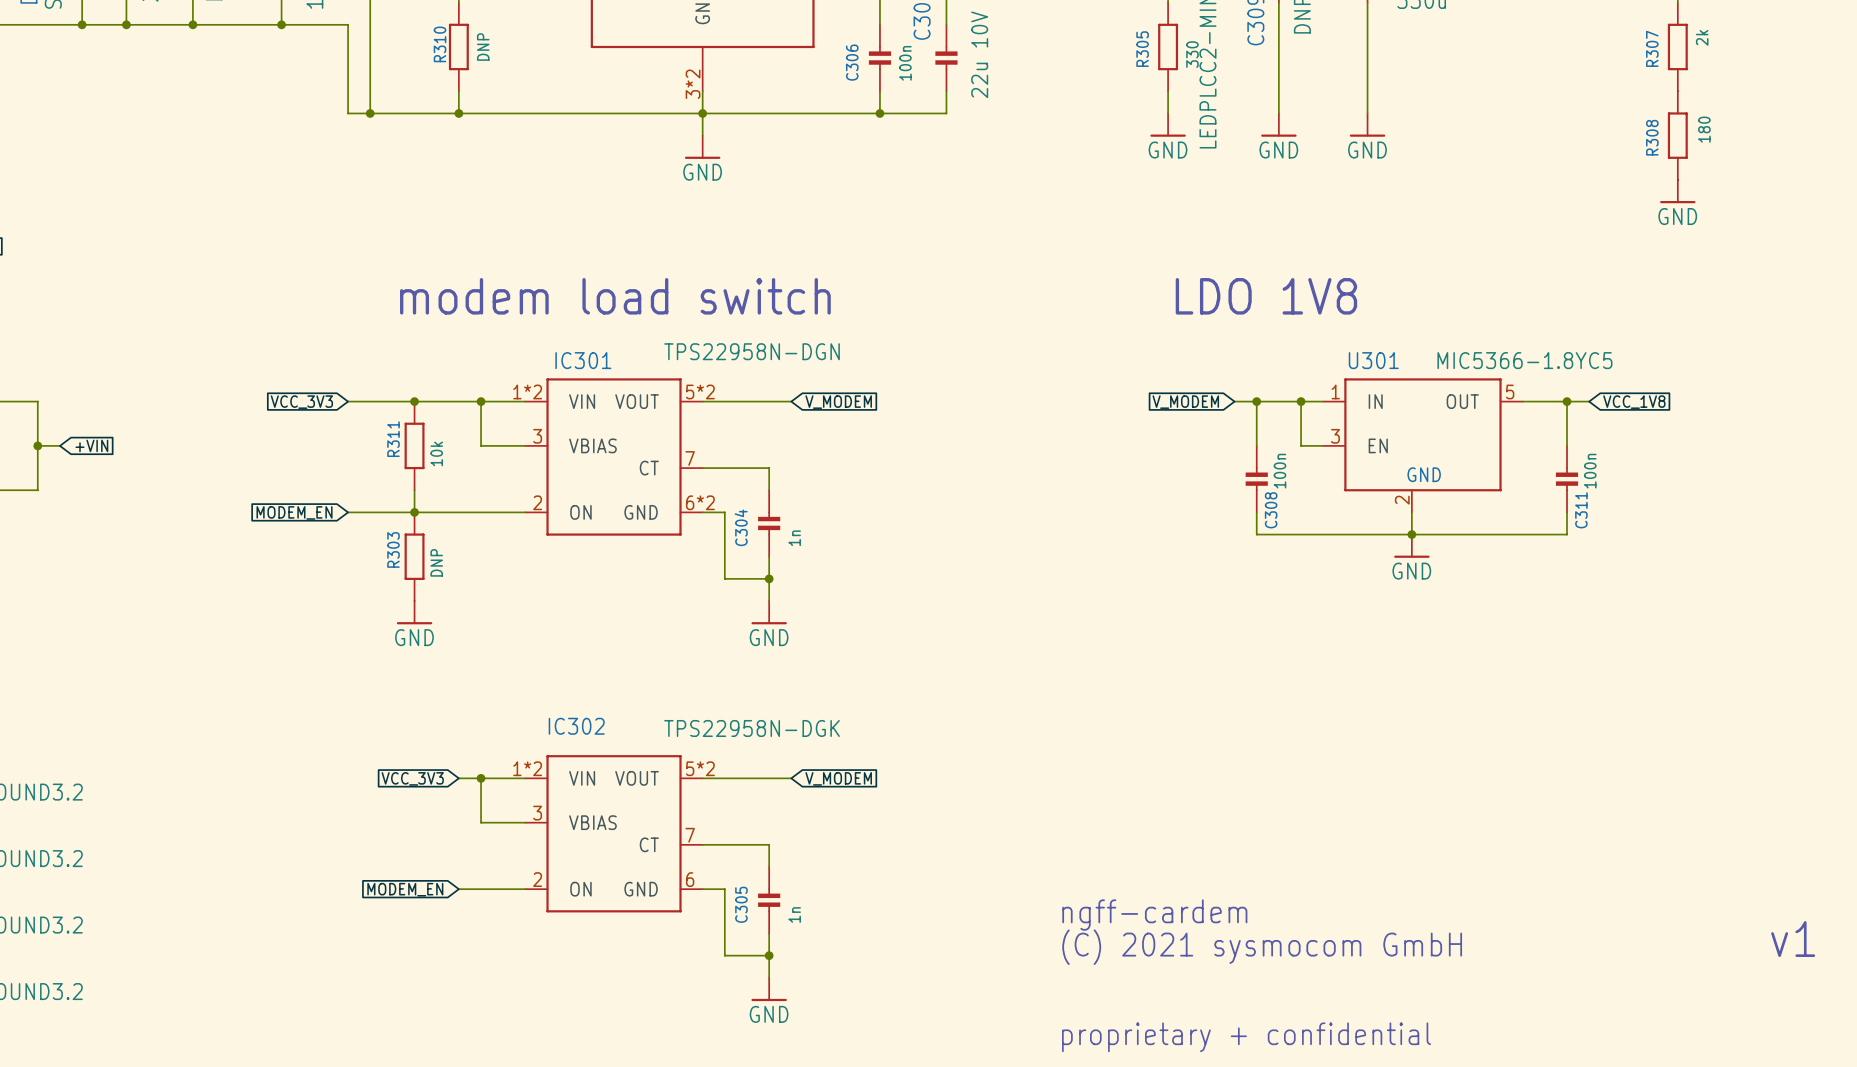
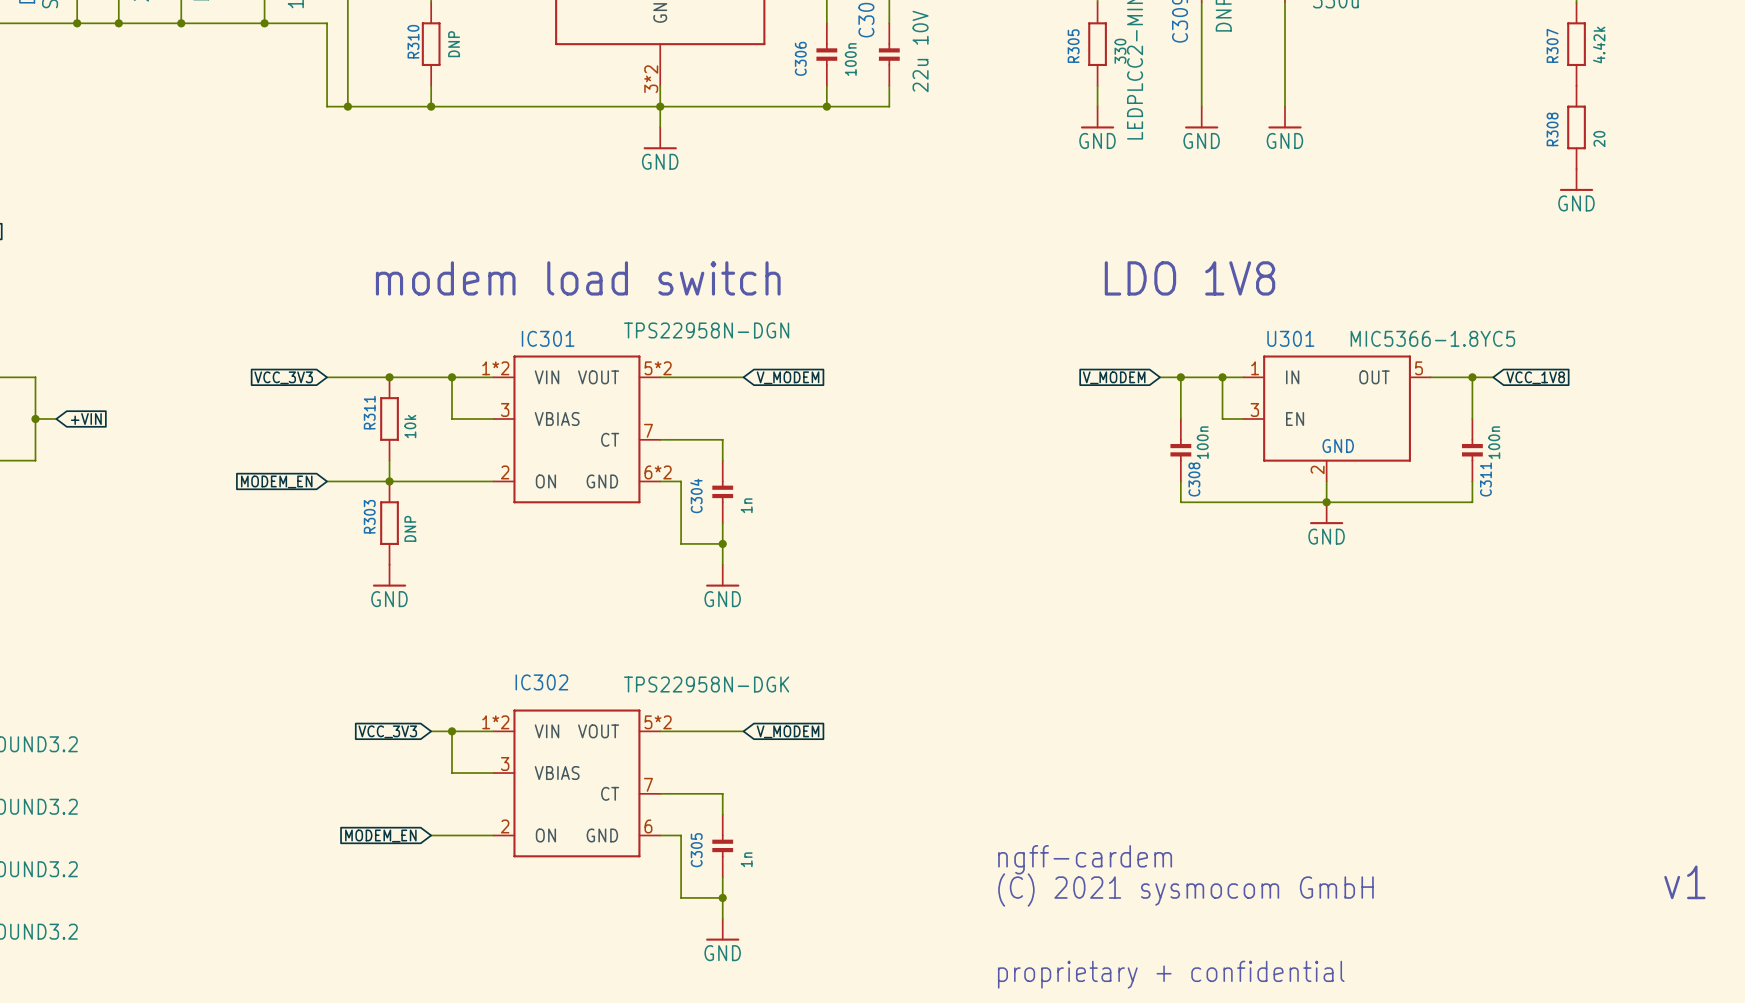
R307 value: 2k (1702, 37) -> 4.42k (1599, 45)
R308 value: 180 (1704, 129) -> 20 (1599, 139)

